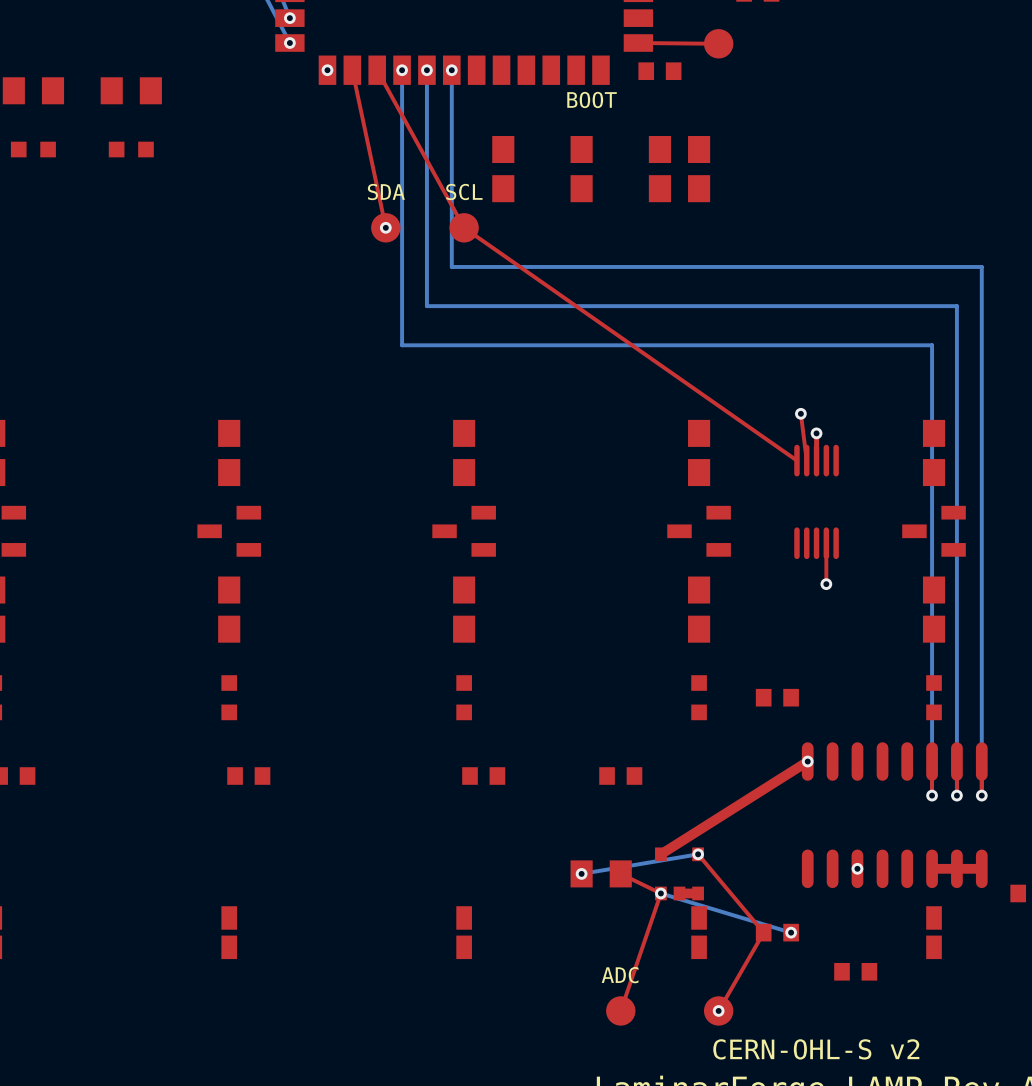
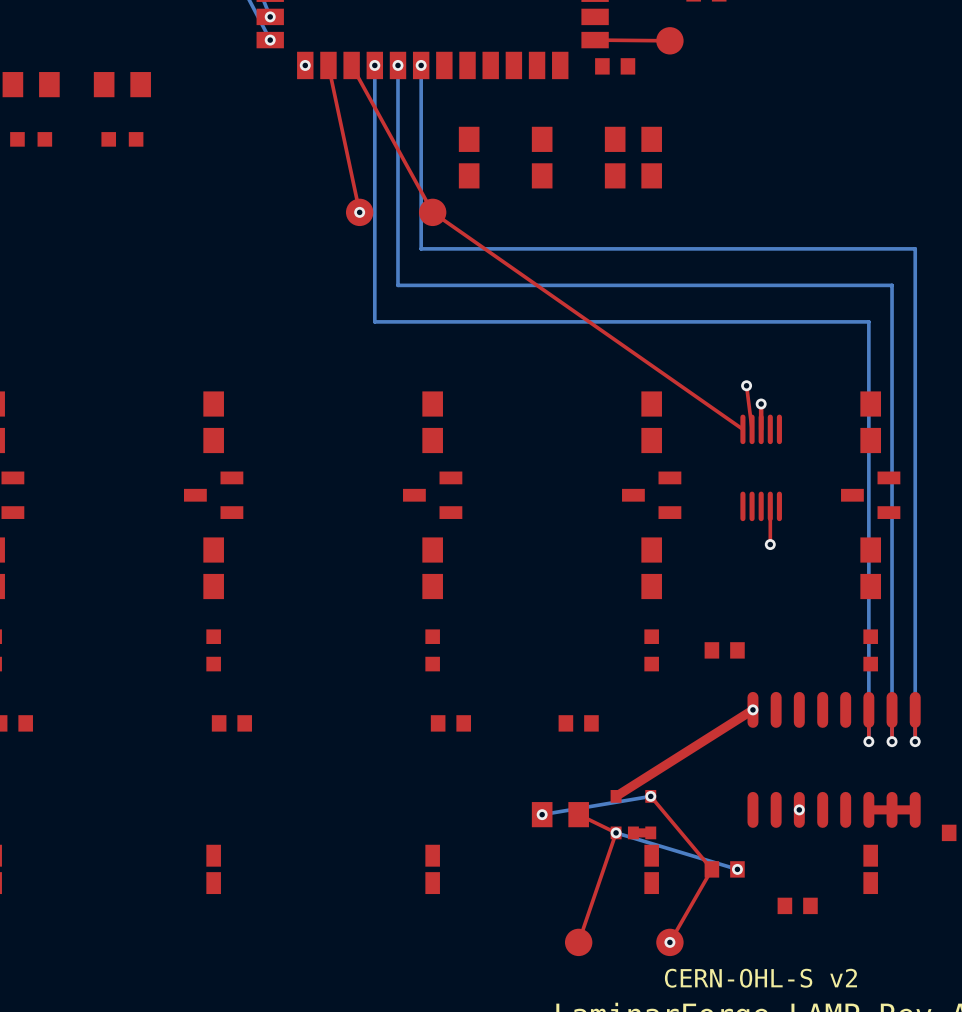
text: BOOT (592, 99) -> none
text: SDA (386, 192) -> none
text: SCL (464, 192) -> none
text: ADC (620, 975) -> none

